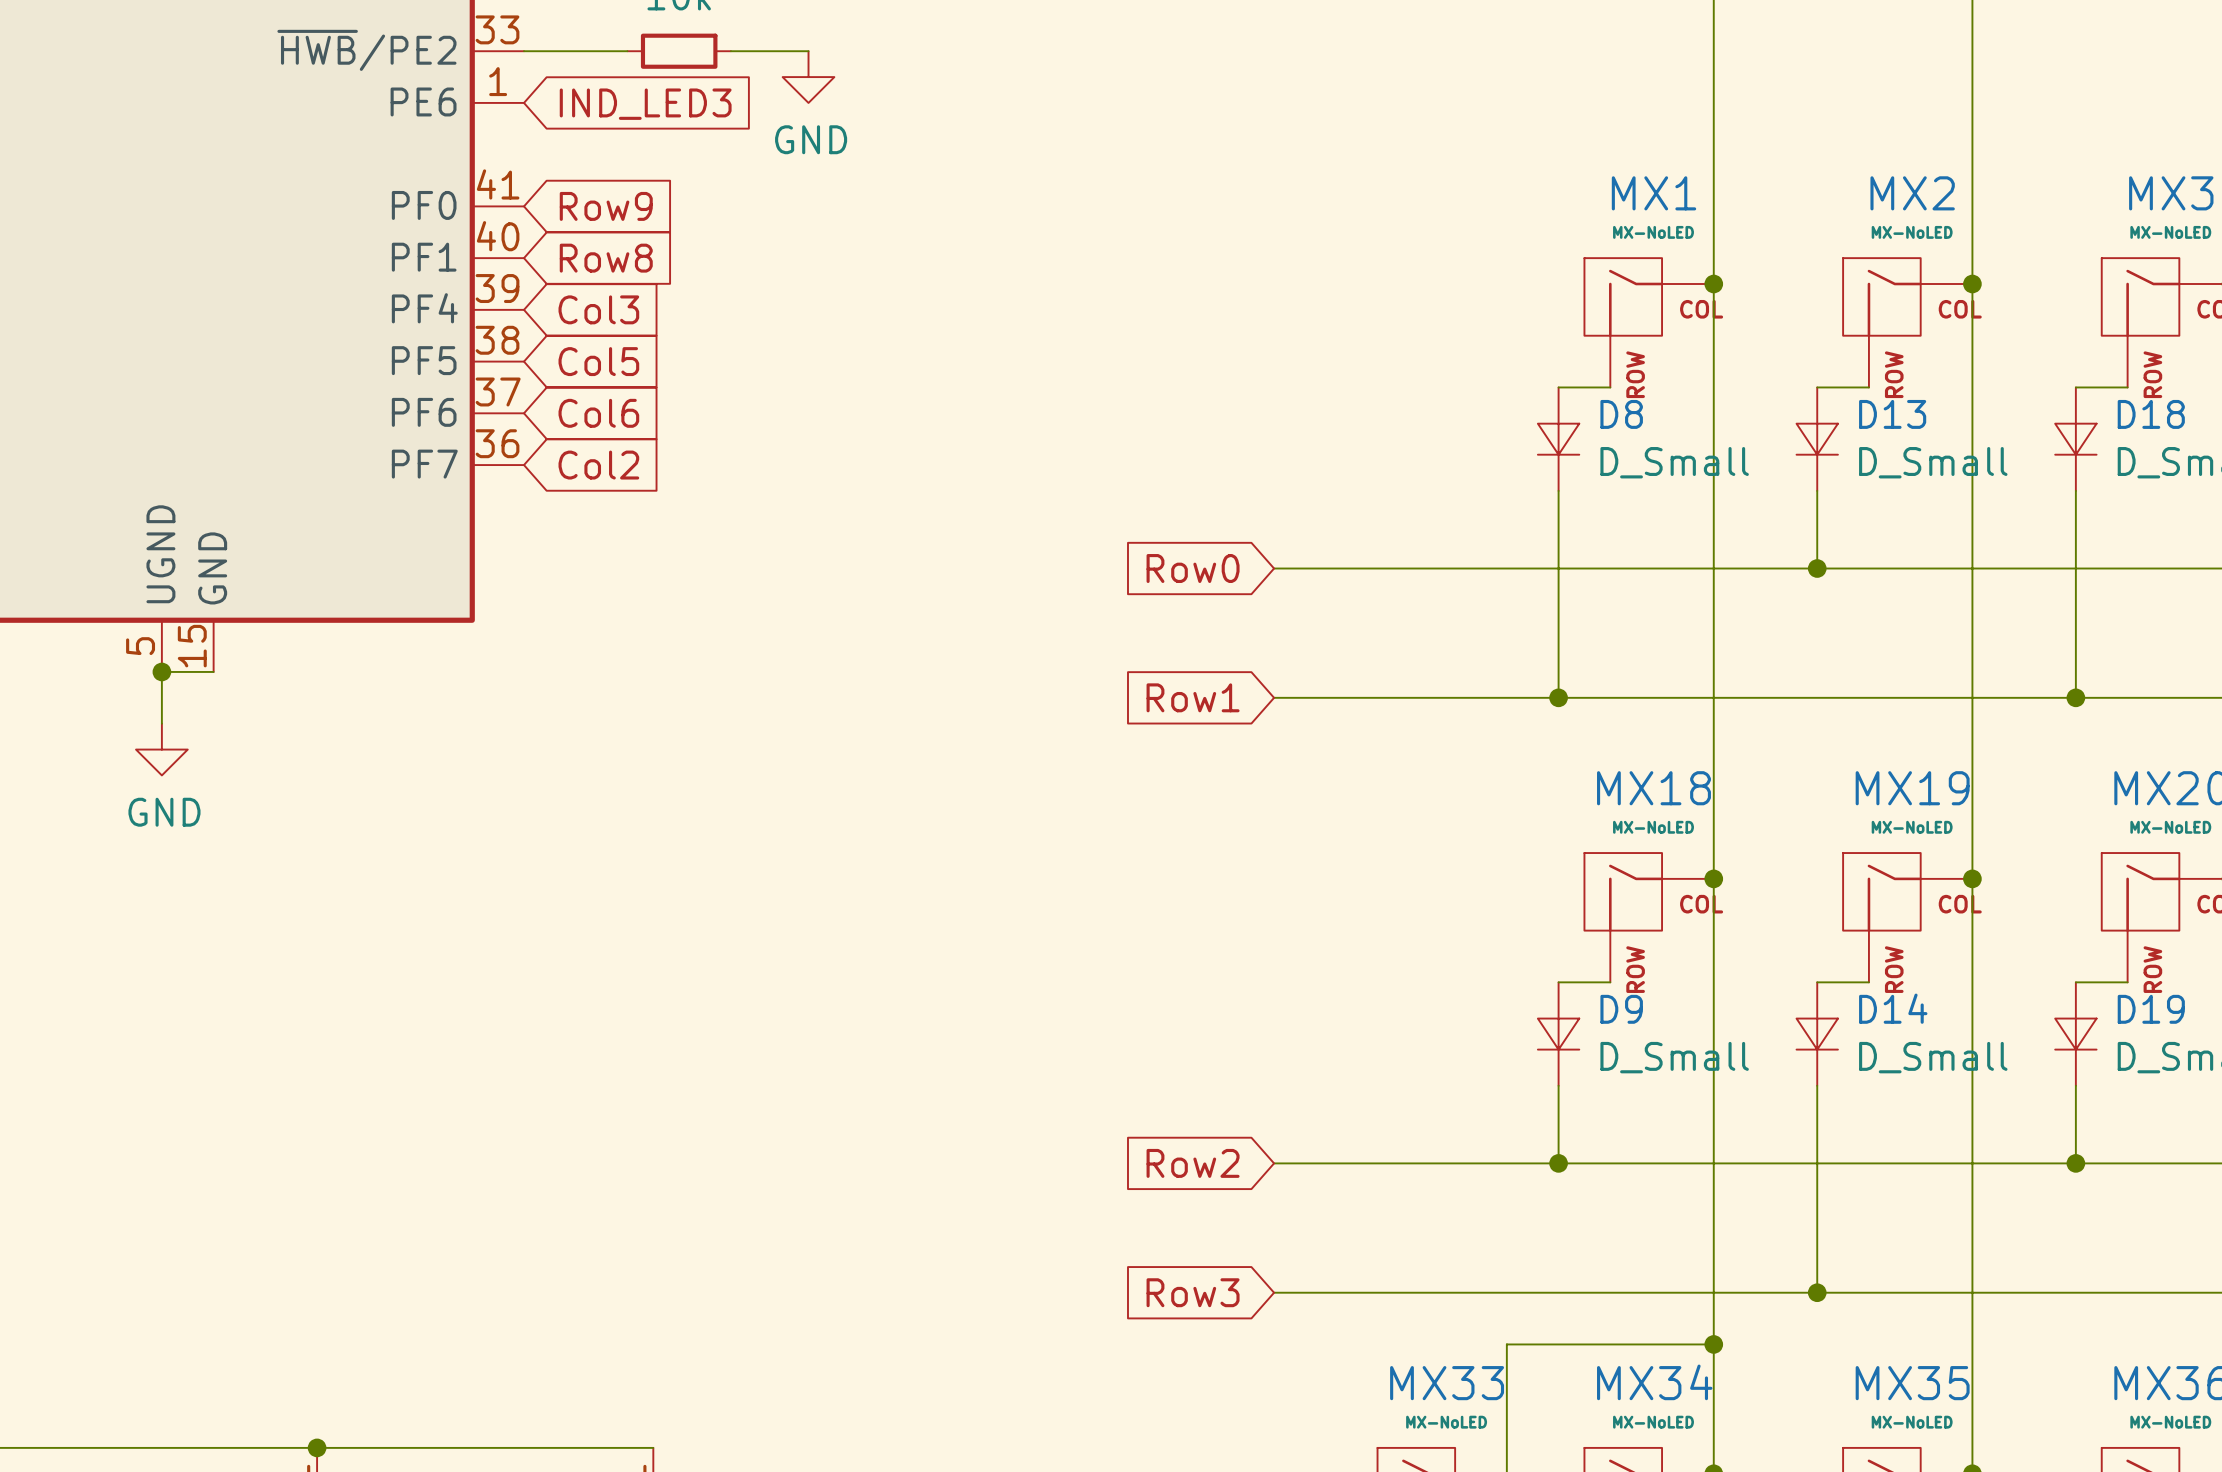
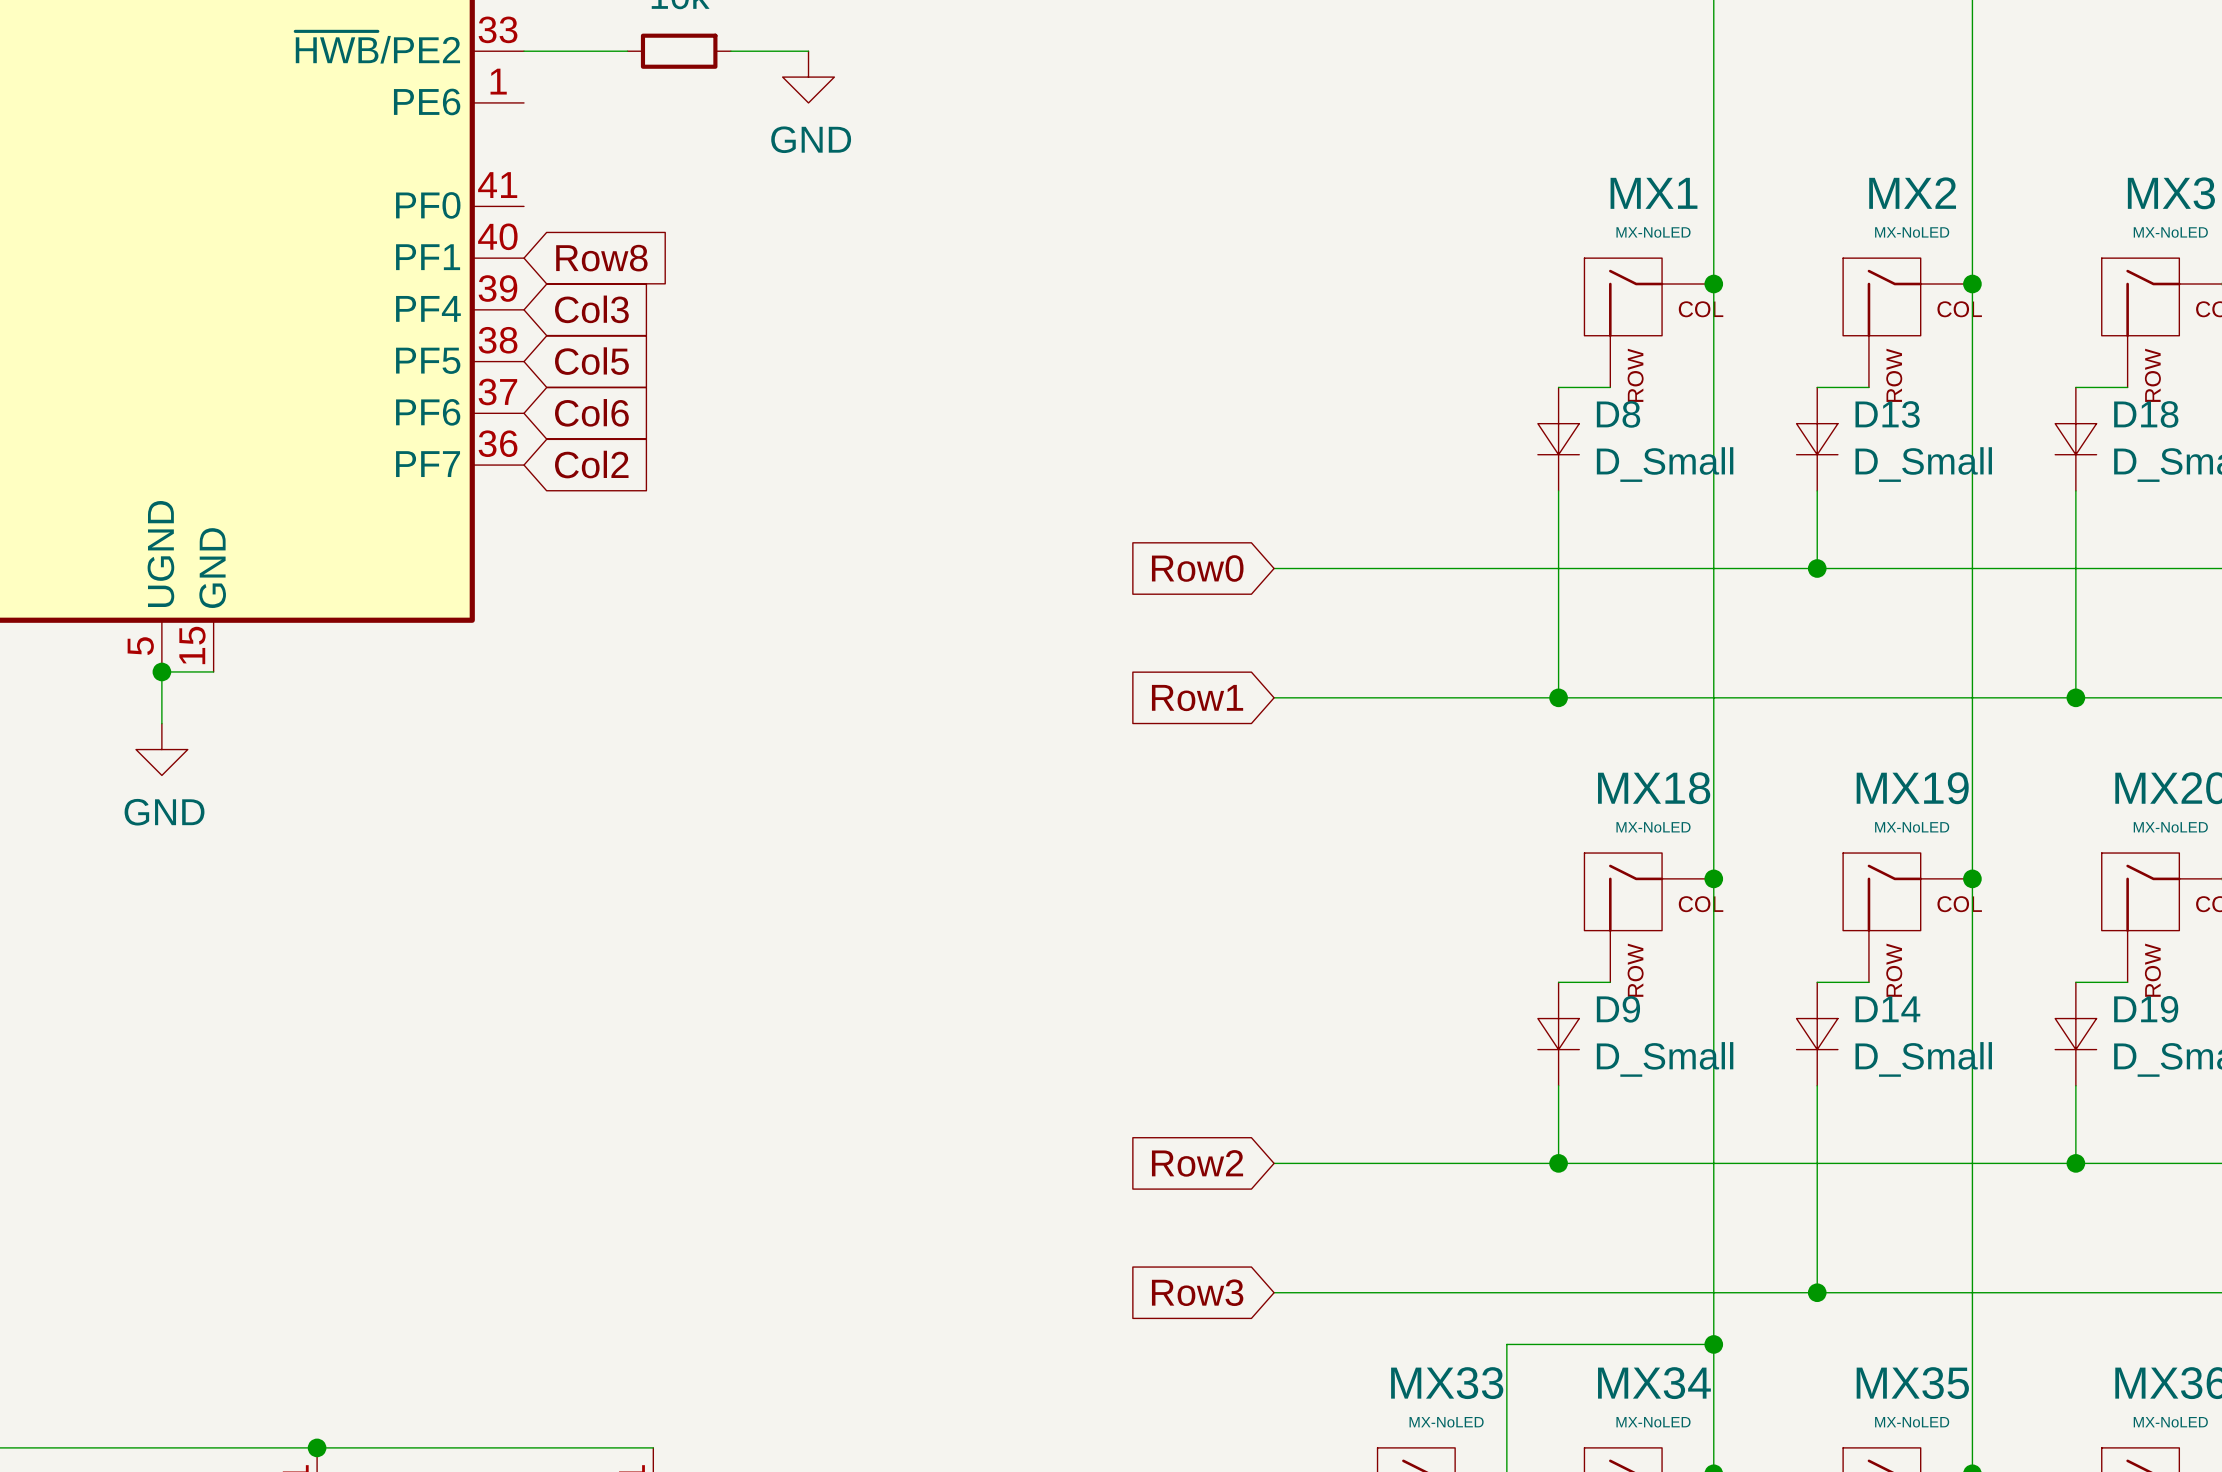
global label: IND_LED3 (645, 104) -> none
global label: Row9 (606, 206) -> none

